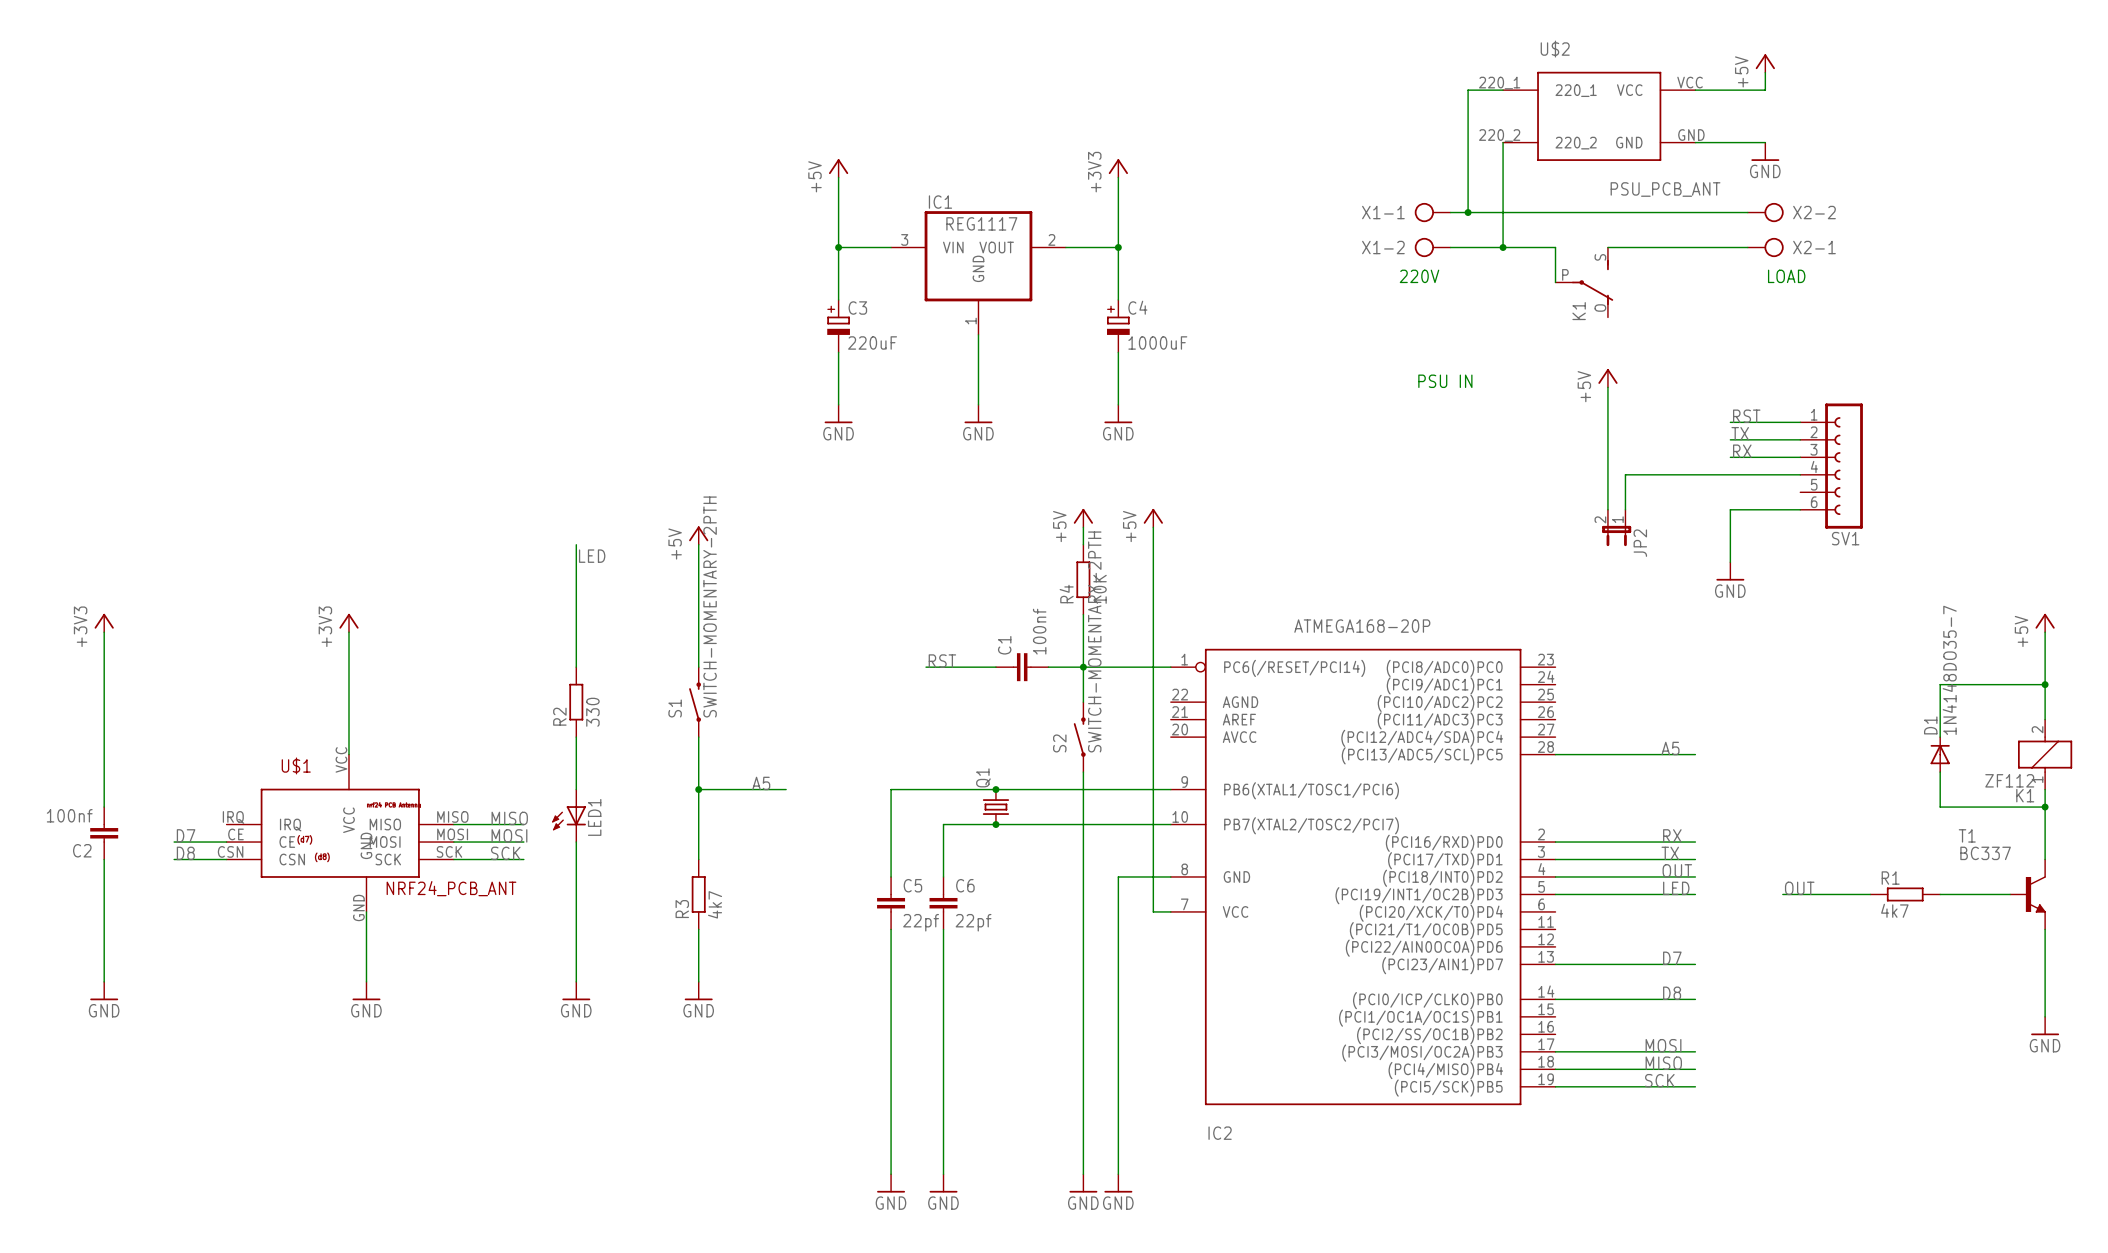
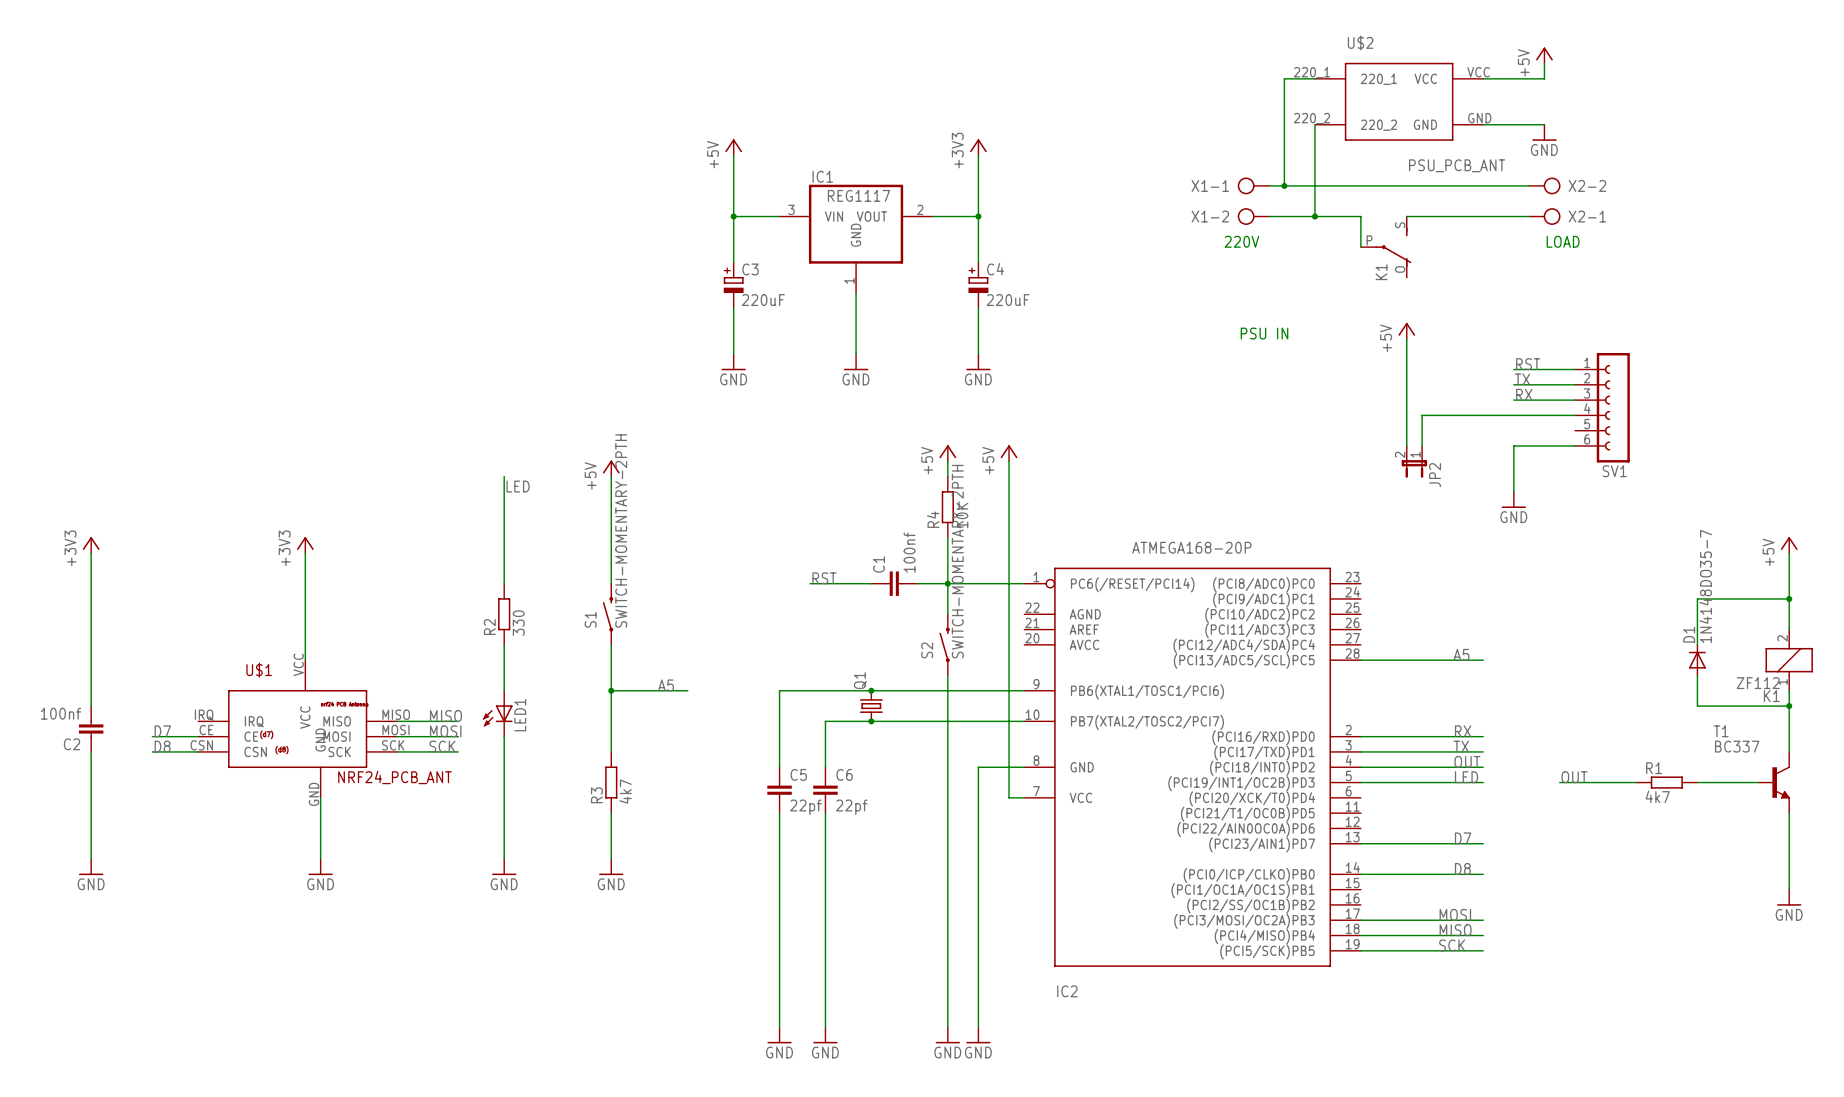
C4 value: 1000uF (1157, 342) -> 220uF (1008, 300)

